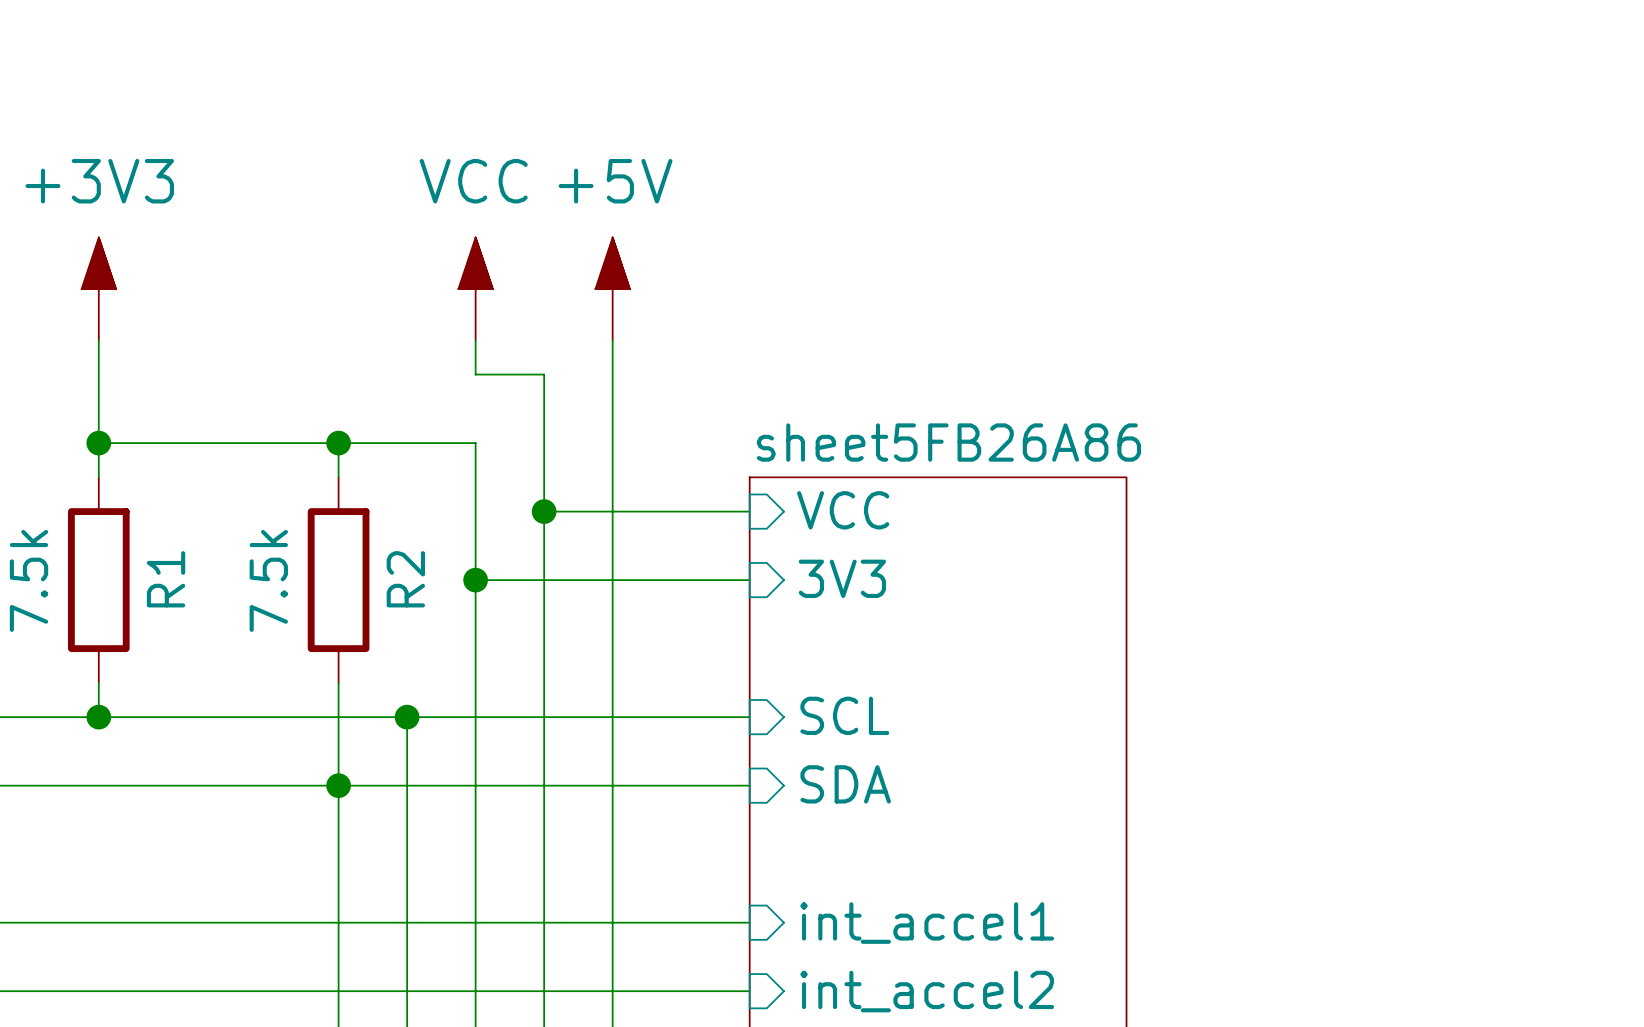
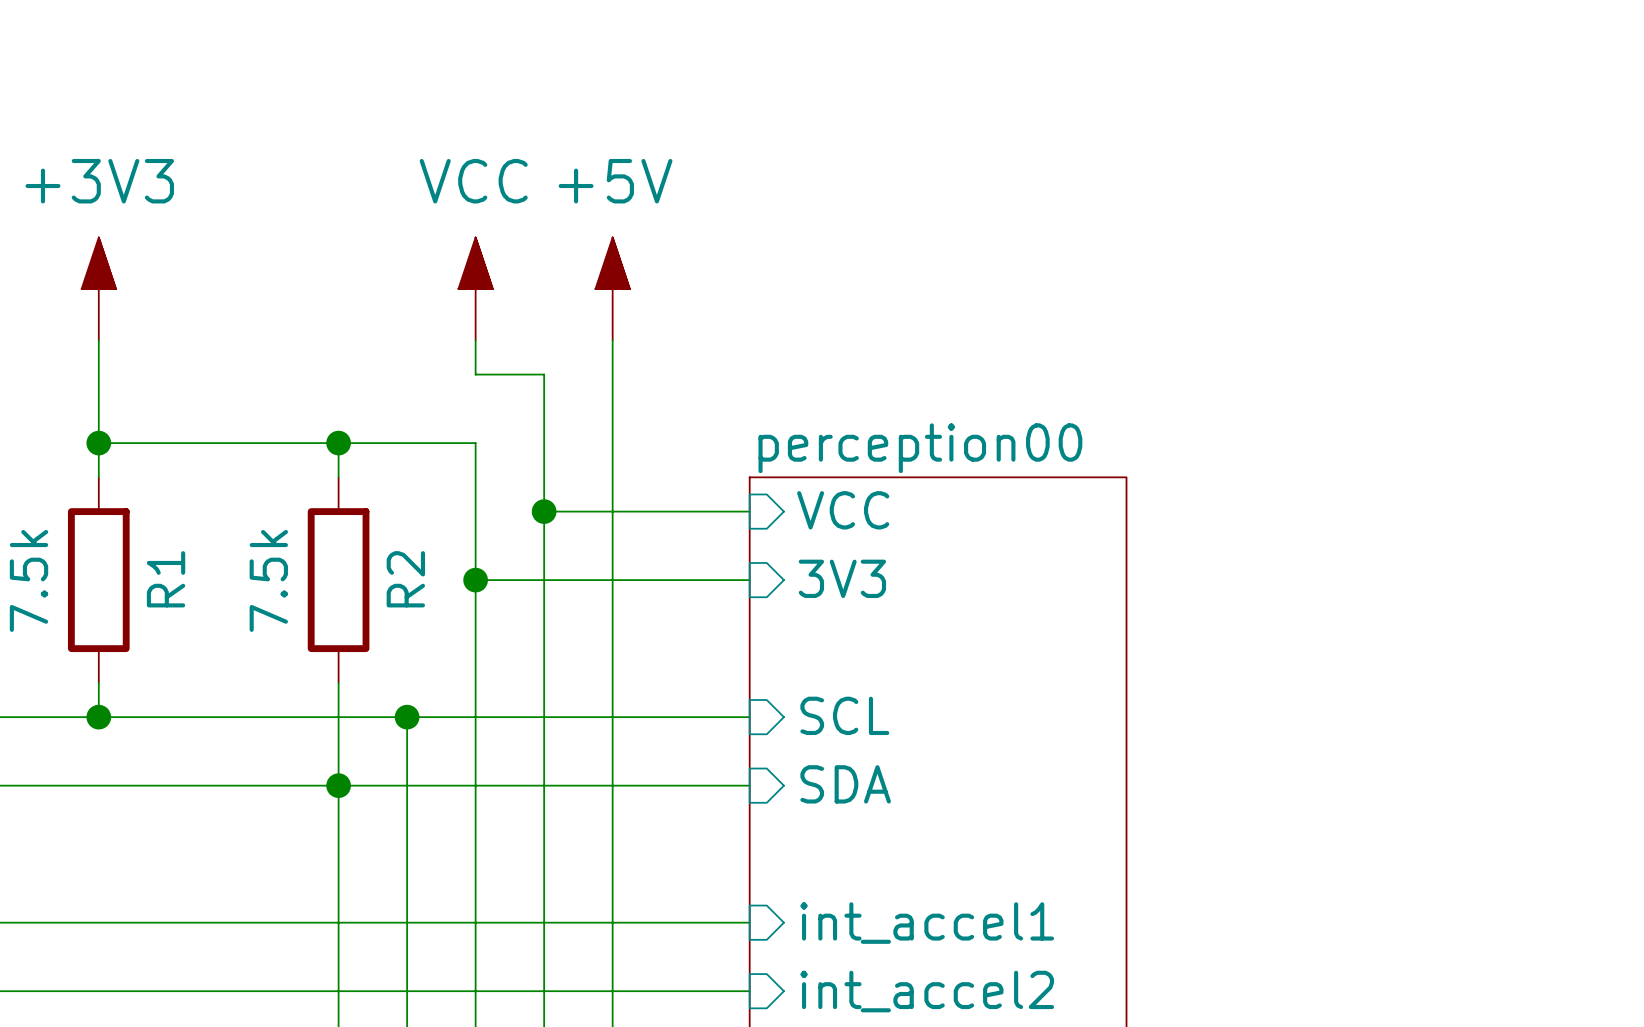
sheet sheet5FB26A86 name: sheet5FB26A86 (948, 442) -> perception00 (920, 448)

